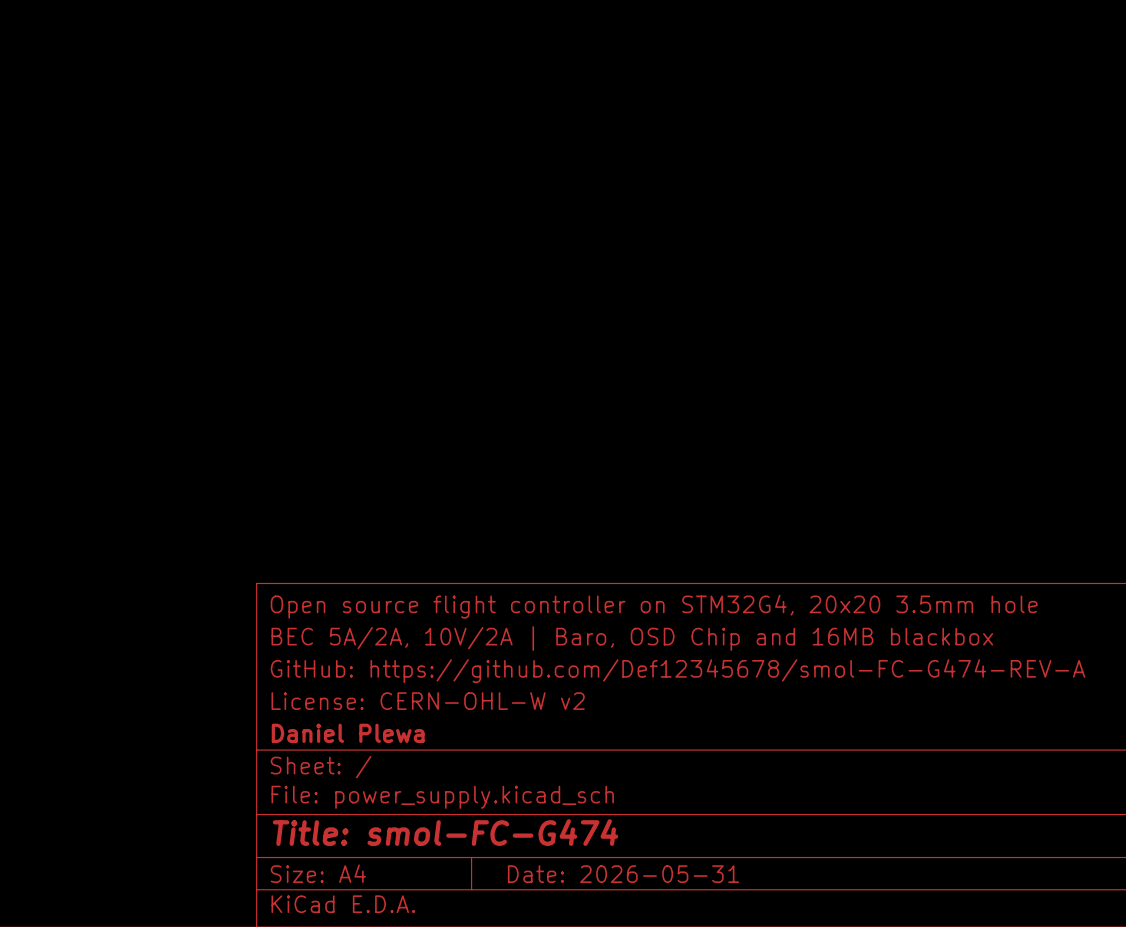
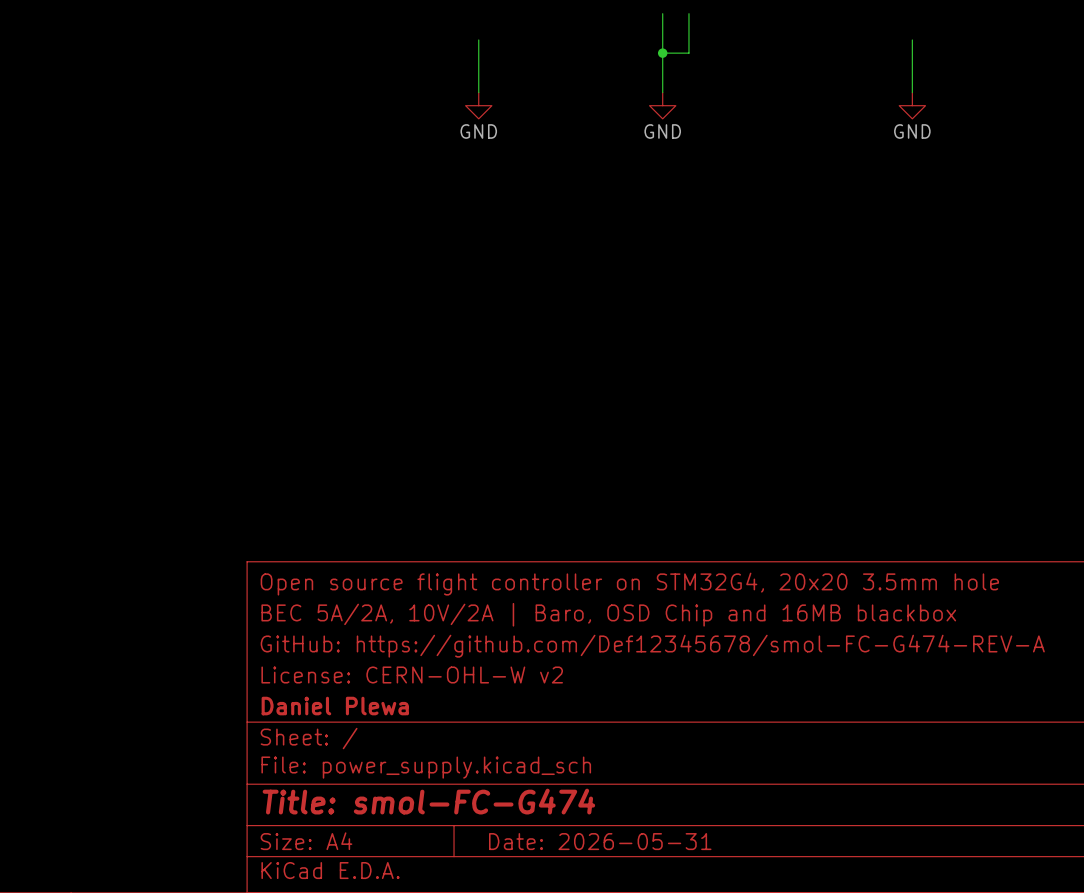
wire: none -> (662, 13) (662, 92)
wire: none -> (688, 13) (688, 53) (662, 53)
wire: none -> (478, 40) (478, 92)
wire: none -> (912, 40) (912, 92)
junction: none -> (662, 53)
power symbol: none -> GND (478, 105)
power symbol: none -> GND (662, 105)
power symbol: none -> GND (912, 105)

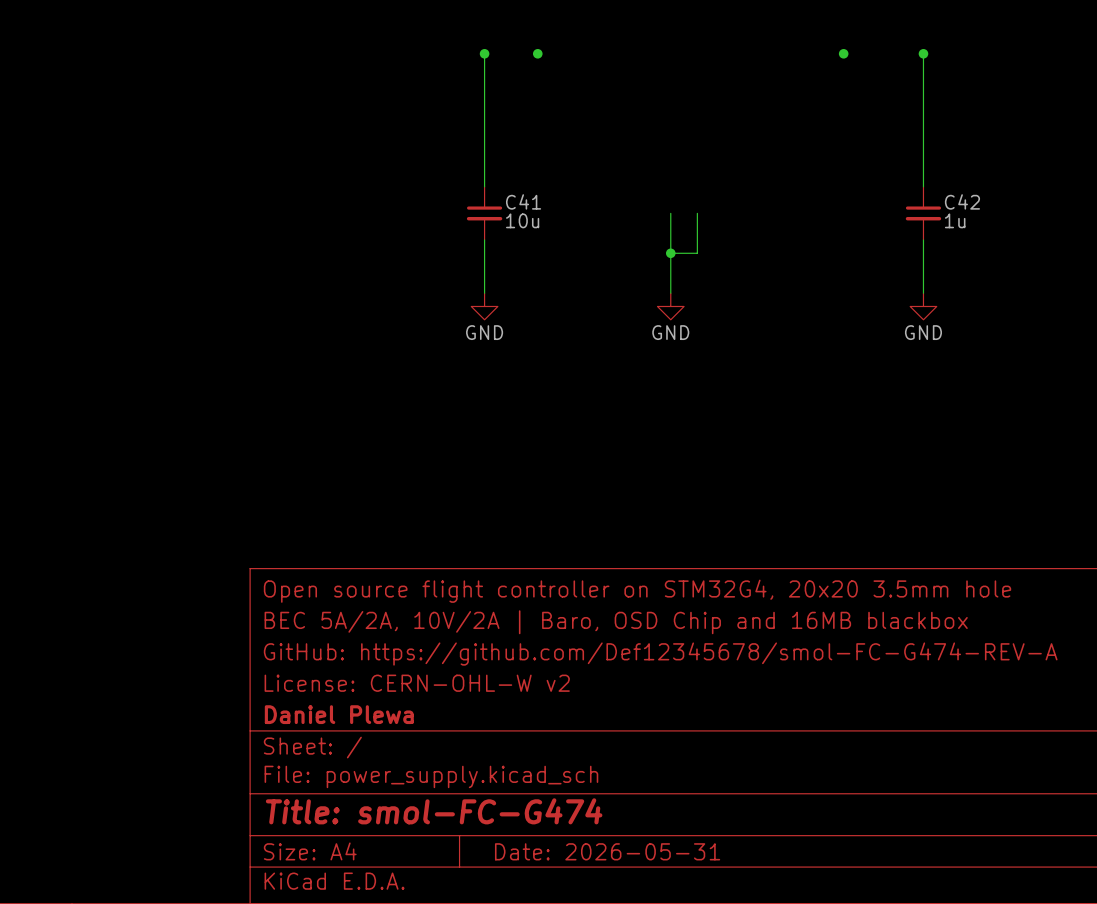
wire: (662, 13) (662, 92) -> (670, 213) (670, 293)
wire: (688, 13) (688, 53) (662, 53) -> (697, 213) (697, 253) (670, 253)
wire: (478, 40) (478, 53) -> none
wire: (912, 40) (912, 53) -> none
junction: none -> (484, 53)
junction: none -> (537, 53)
junction: (662, 53) -> none
junction: none -> (843, 53)
junction: none -> (923, 53)
wire: none -> (484, 93) (484, 186)
wire: none -> (923, 93) (923, 186)
power symbol: GND (478, 105) -> none
power symbol: GND (662, 105) -> none
power symbol: GND (912, 105) -> none
C41: none -> 10u (484, 213)
C42: none -> 1u (923, 213)
wire: none -> (484, 239) (484, 293)
wire: none -> (923, 239) (923, 293)
junction: none -> (670, 253)
power symbol: none -> GND (484, 306)
power symbol: none -> GND (670, 306)
power symbol: none -> GND (923, 306)

